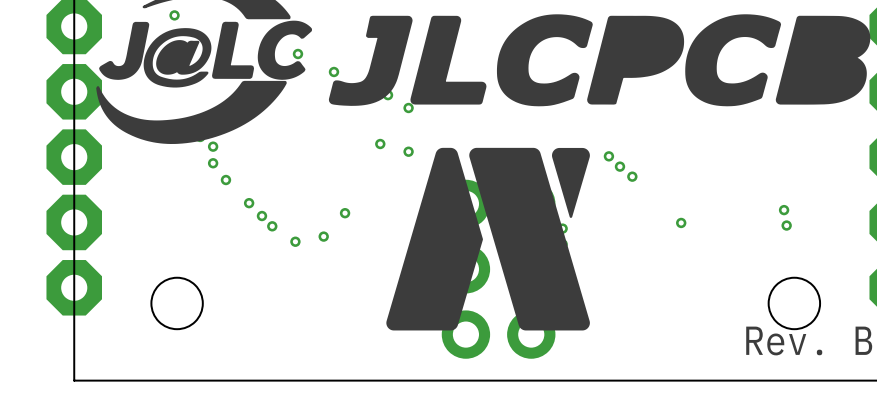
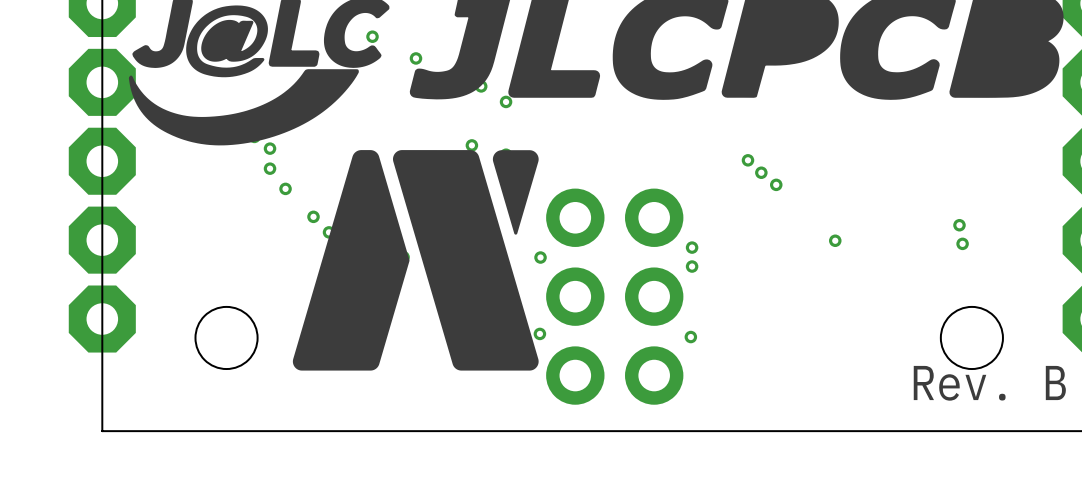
drawing position: (570, 182) -> (515, 192)
drawing position: (434, 239) -> (351, 260)
drawing position: (529, 239) -> (465, 260)

